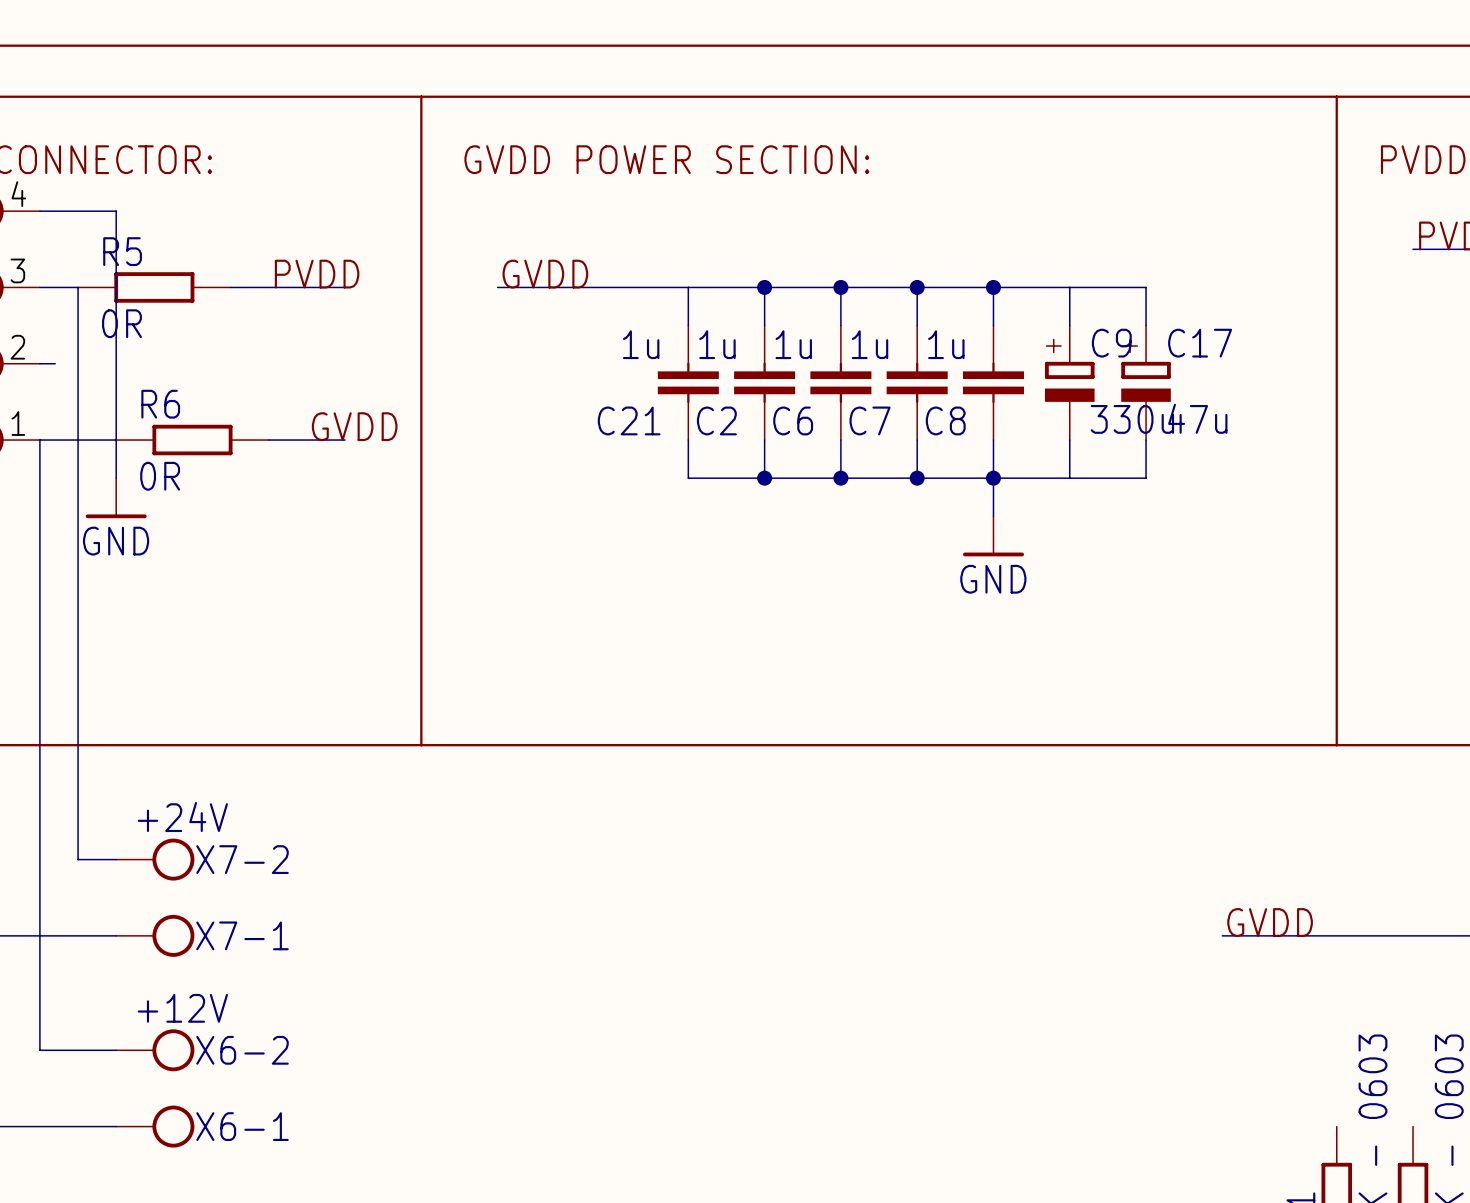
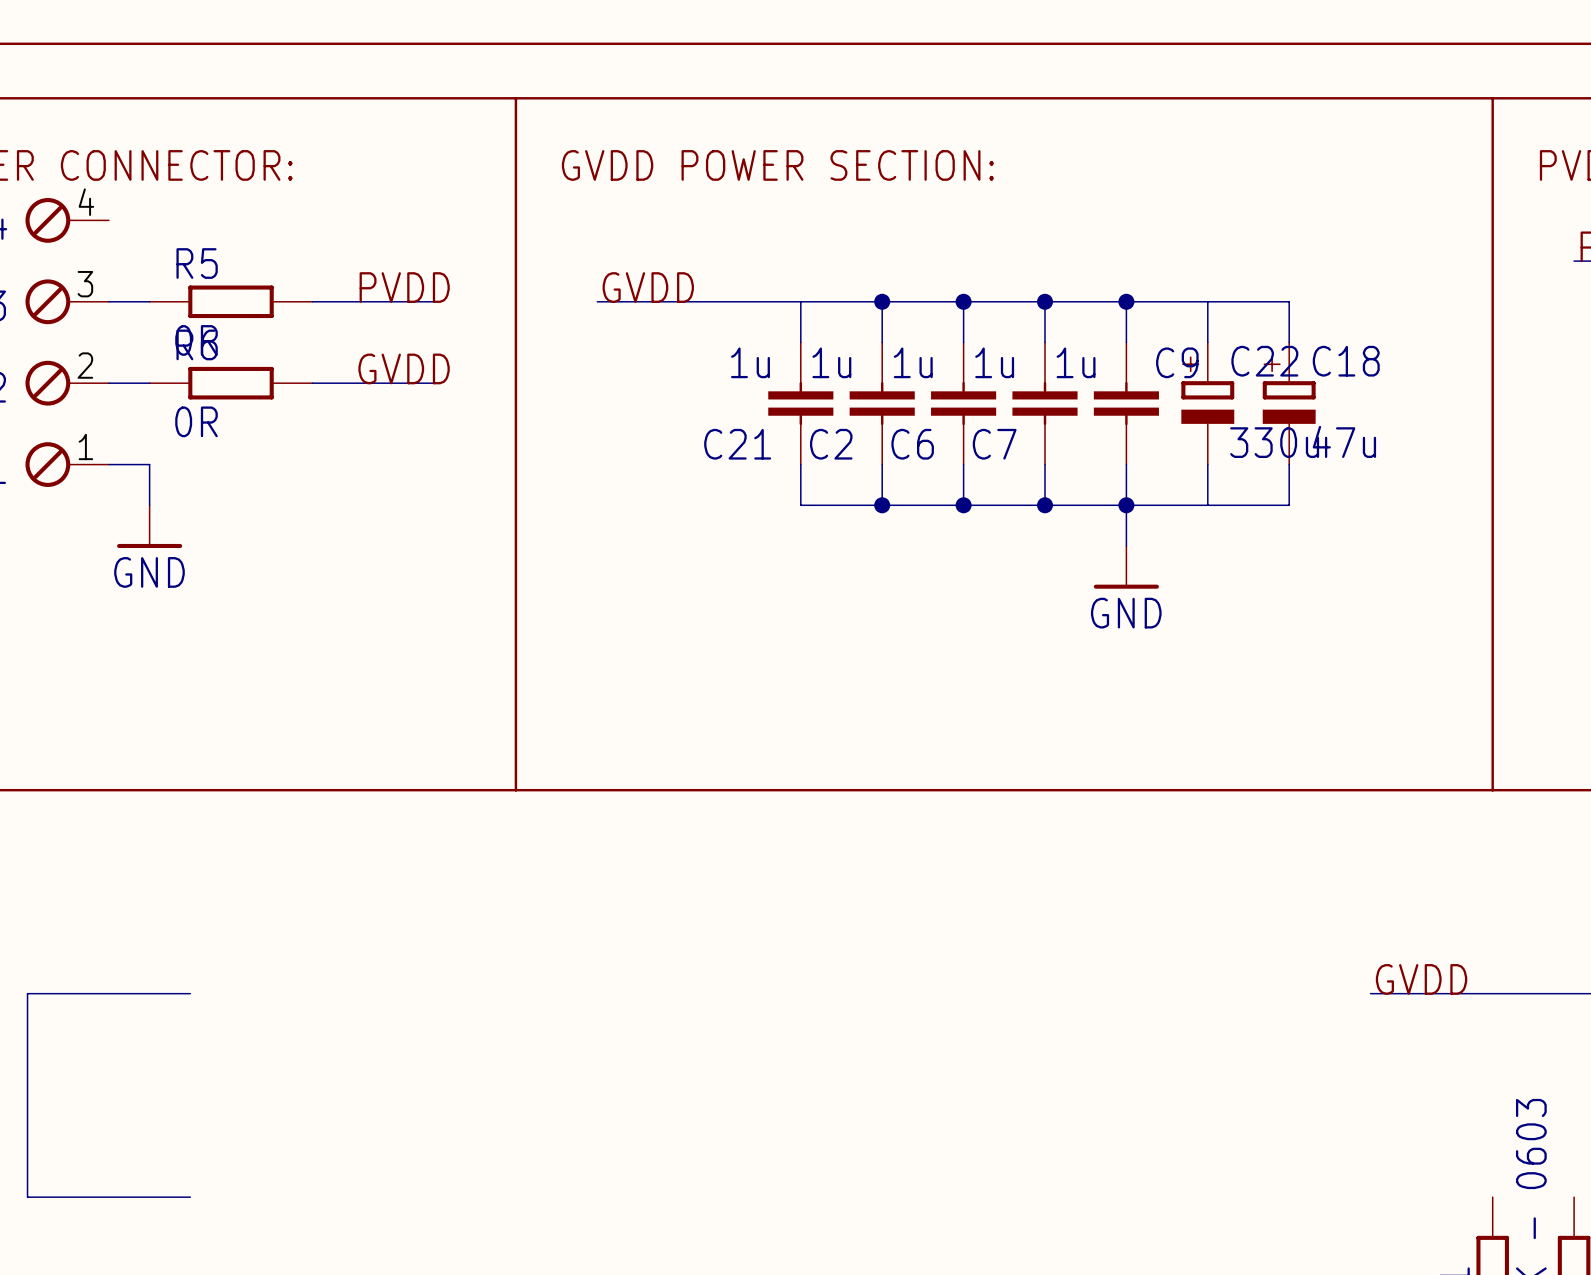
wire: (39, 211) (116, 211) (116, 478) -> none
wire: (78, 287) (78, 440) (116, 440) -> none
C9 name: C9 (1111, 343) -> C22 (1264, 361)
C17 name: C17 (1200, 343) -> C18 (1346, 361)
wire: none -> (125, 383) (149, 383)
wire: none -> (312, 383) (434, 383)
C8 name: C8 (945, 420) -> C9 (1177, 362)
label position: GVDD (354, 426) -> GVDD (404, 368)
wire: (39, 440) (39, 1050) (116, 1050) -> none
R6 position: (192, 440) -> (231, 383)
wire: (268, 440) (345, 440) -> none
wire: (78, 478) (78, 859) (116, 859) -> none
power symbol position: GND (116, 498) -> GND (149, 526)
X7-2: +24V (155, 859) -> none
X7-1: (155, 935) -> none
X6-2: +12V (155, 1050) -> none
X6-1: (155, 1126) -> none

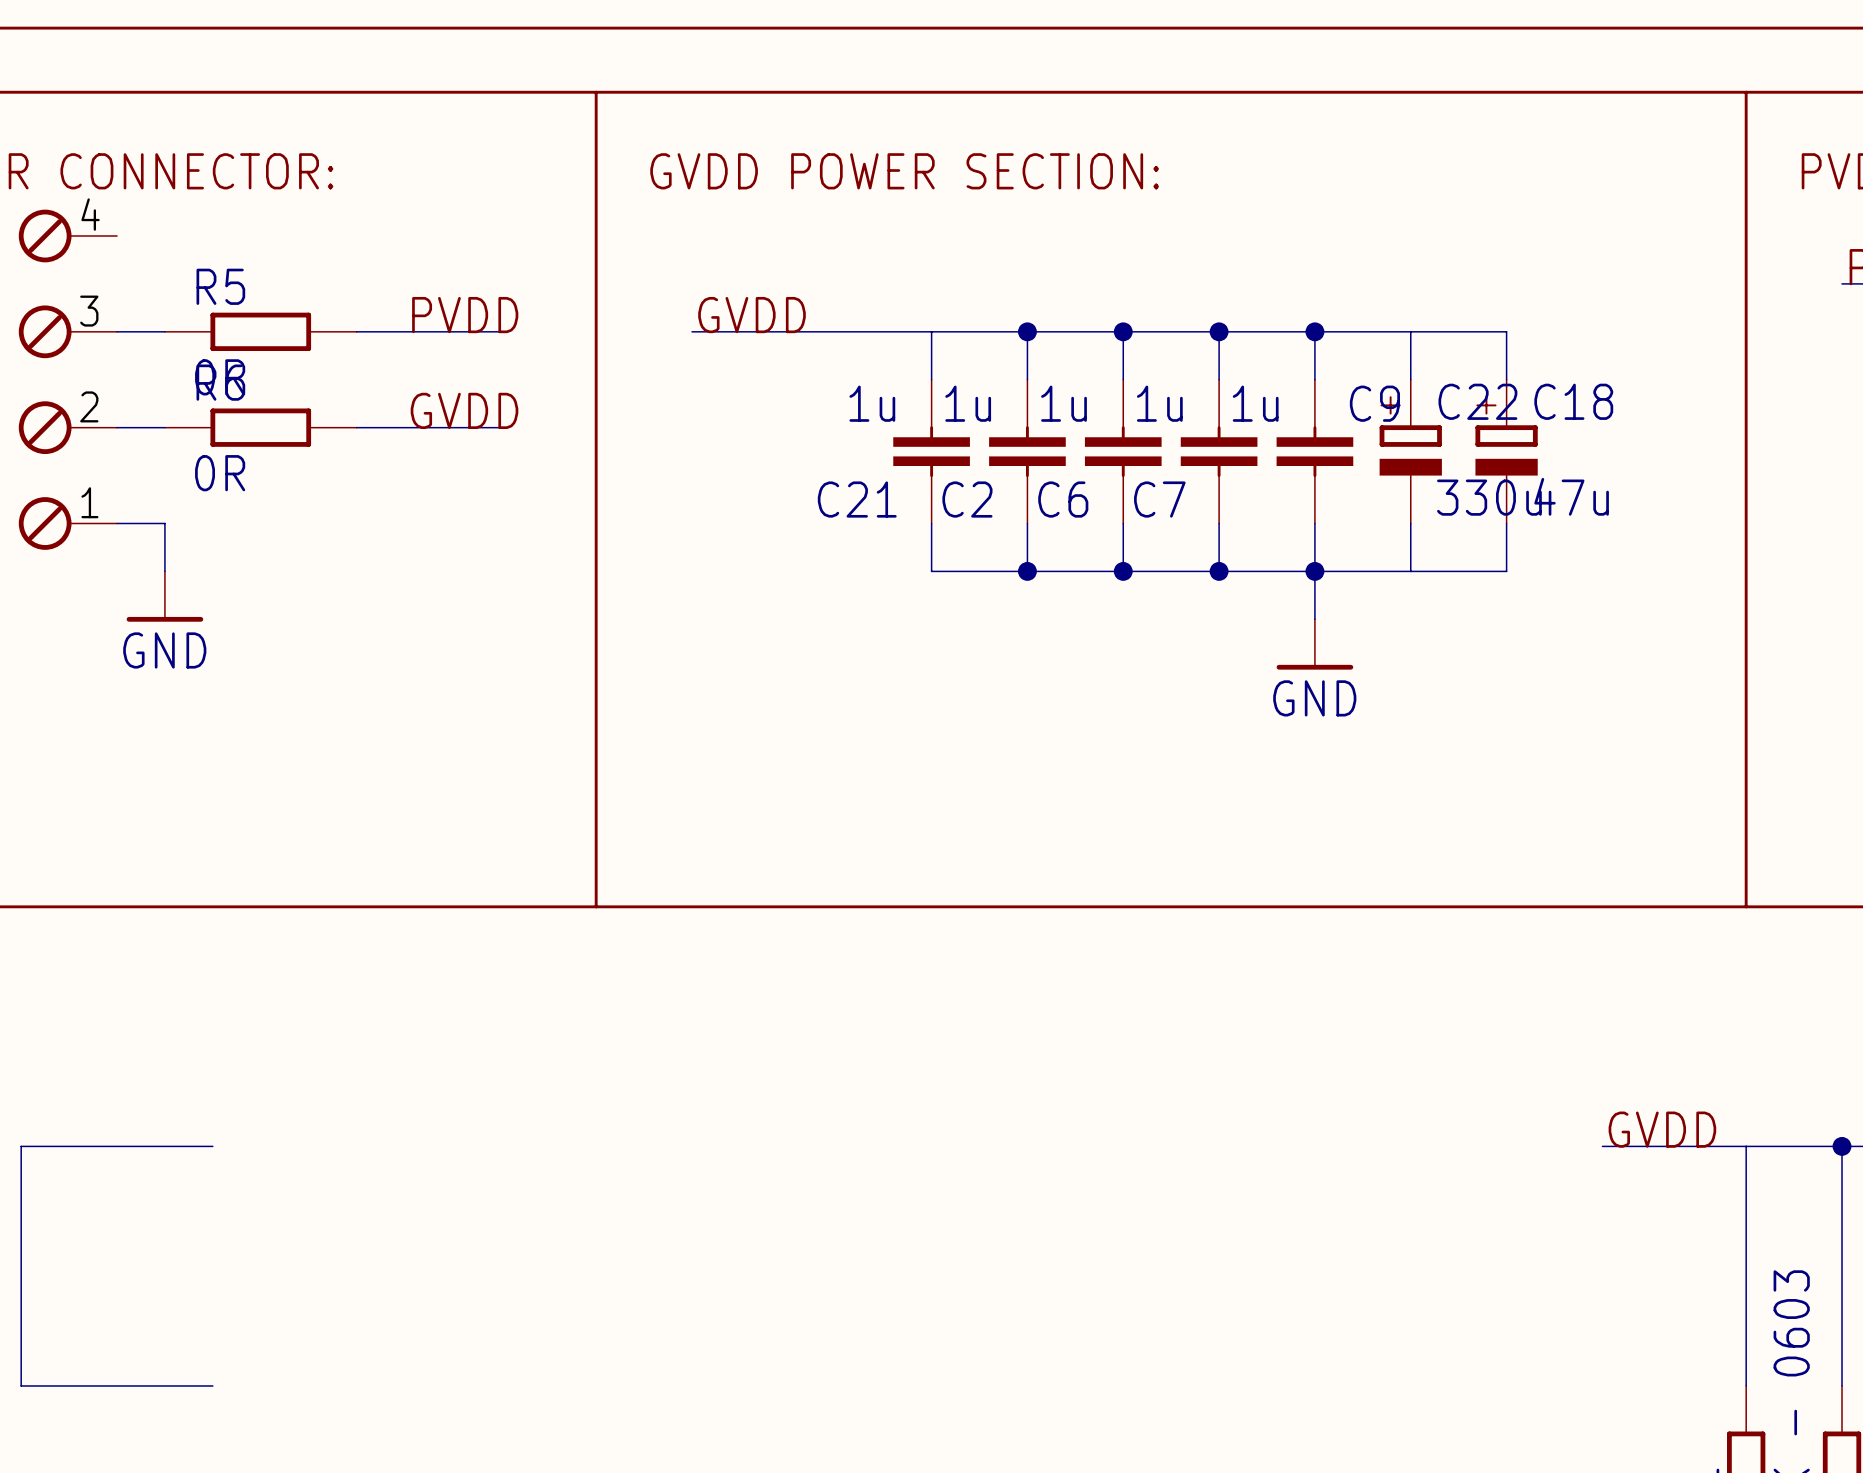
wire: none -> (1746, 1146) (1746, 1385)
wire: none -> (1842, 1146) (1842, 1385)
junction: none -> (1842, 1146)

